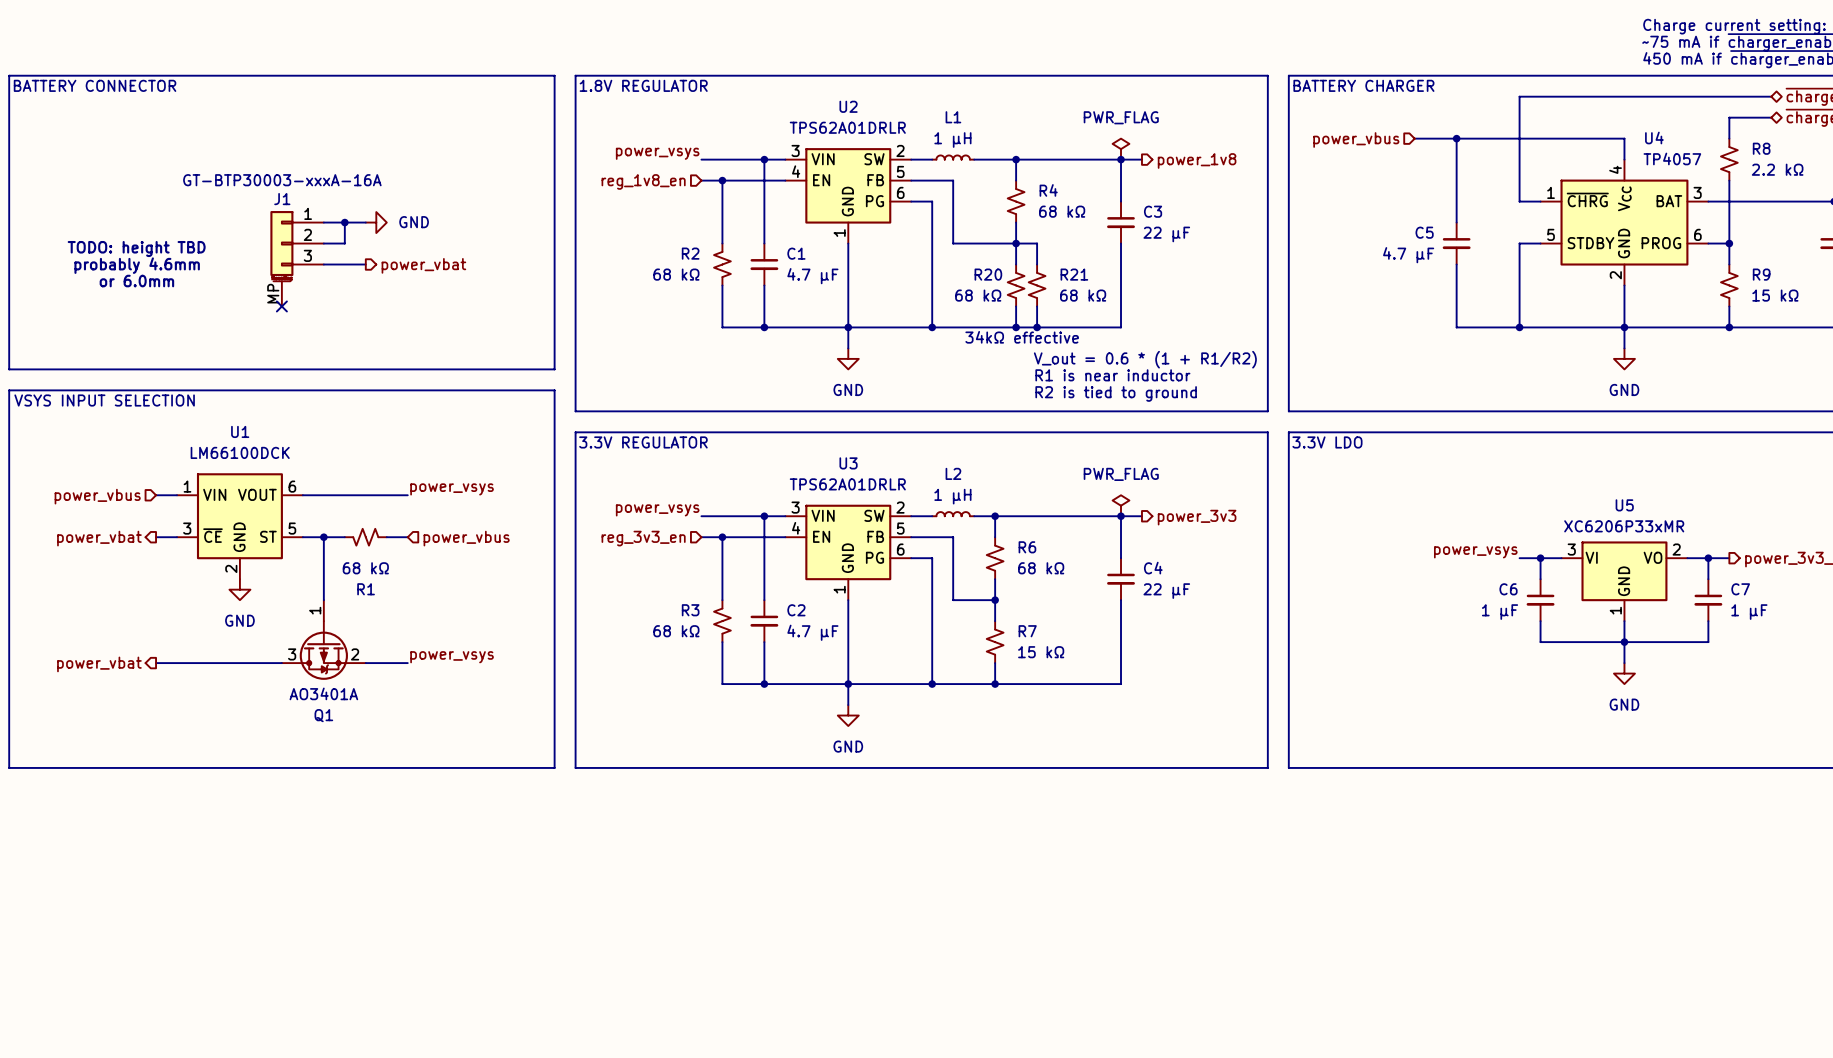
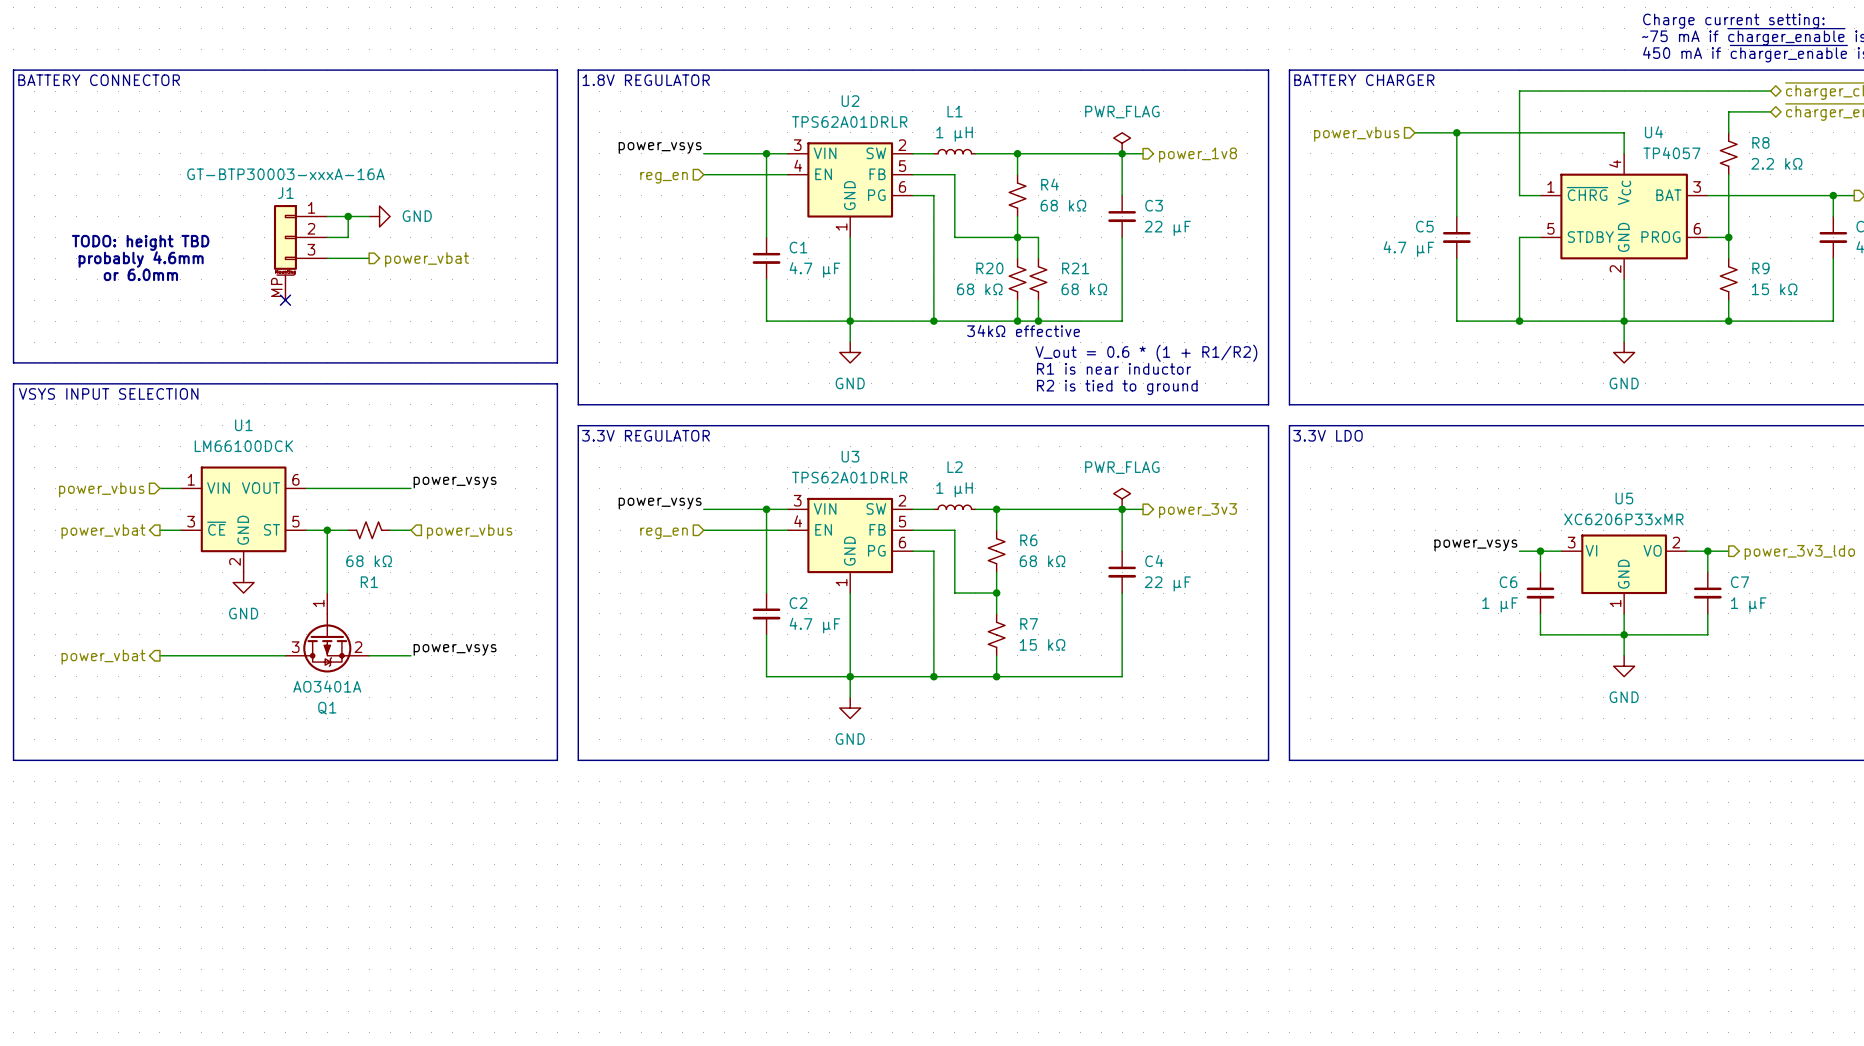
wire: (722, 180) (722, 243) -> none
junction: (722, 180) -> none
hierarchical label: reg_1v8_en (643, 181) -> reg_en (664, 177)
R2: 68 kΩ (722, 264) -> none
wire: (722, 285) (722, 327) (764, 327) -> none
junction: (764, 327) -> none
wire: (722, 537) (722, 600) -> none
junction: (722, 537) -> none
hierarchical label: reg_3v3_en (643, 538) -> reg_en (664, 533)
R3: 68 kΩ (722, 621) -> none
wire: (722, 642) (722, 684) (764, 684) -> none
junction: (764, 684) -> none

